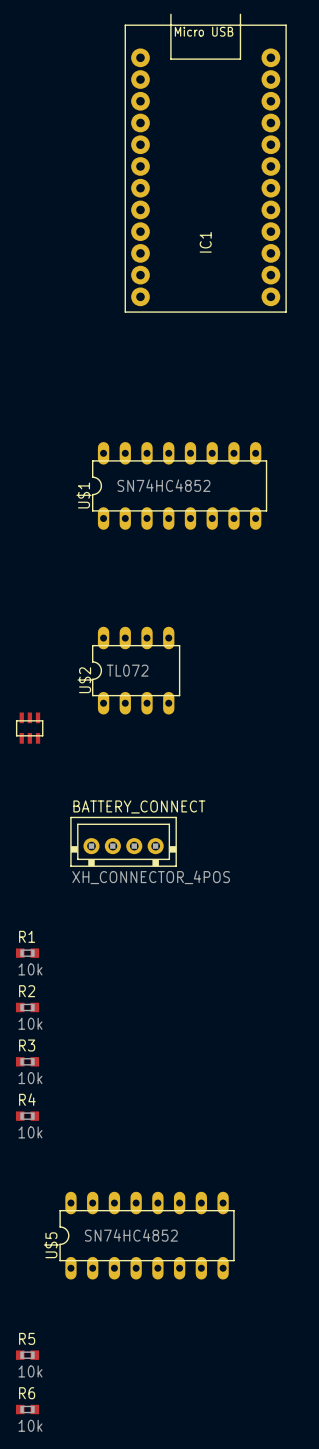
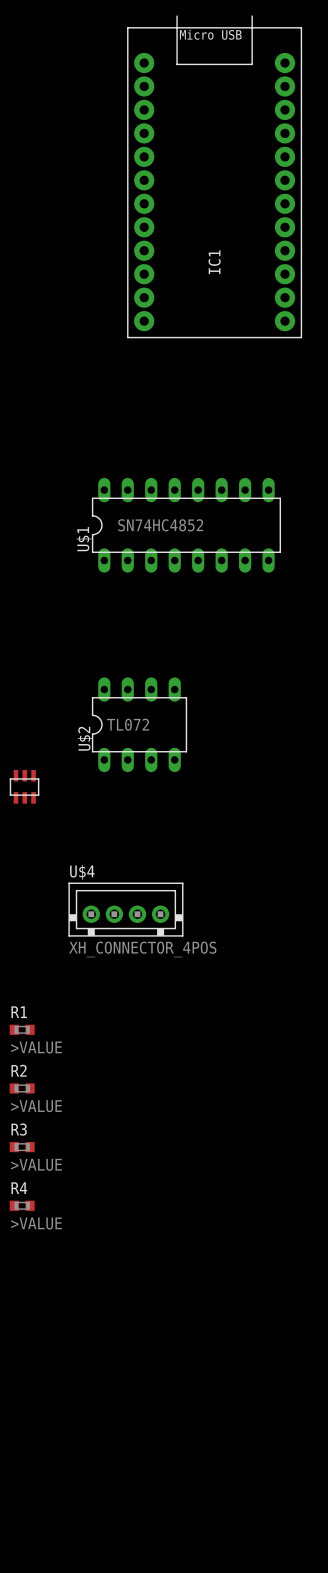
BATTERY_CONNECT name: BATTERY_CONNECT (139, 806) -> U$4 (82, 872)
R1 value: 10k (30, 969) -> >VALUE (36, 1047)
R2 value: 10k (30, 1023) -> >VALUE (36, 1106)
R3 value: 10k (30, 1078) -> >VALUE (36, 1164)
R4 value: 10k (30, 1132) -> >VALUE (36, 1223)
U$5: SN74HC4852 (147, 1235) -> none
R5: 10k (27, 1355) -> none
R6: 10k (27, 1409) -> none

